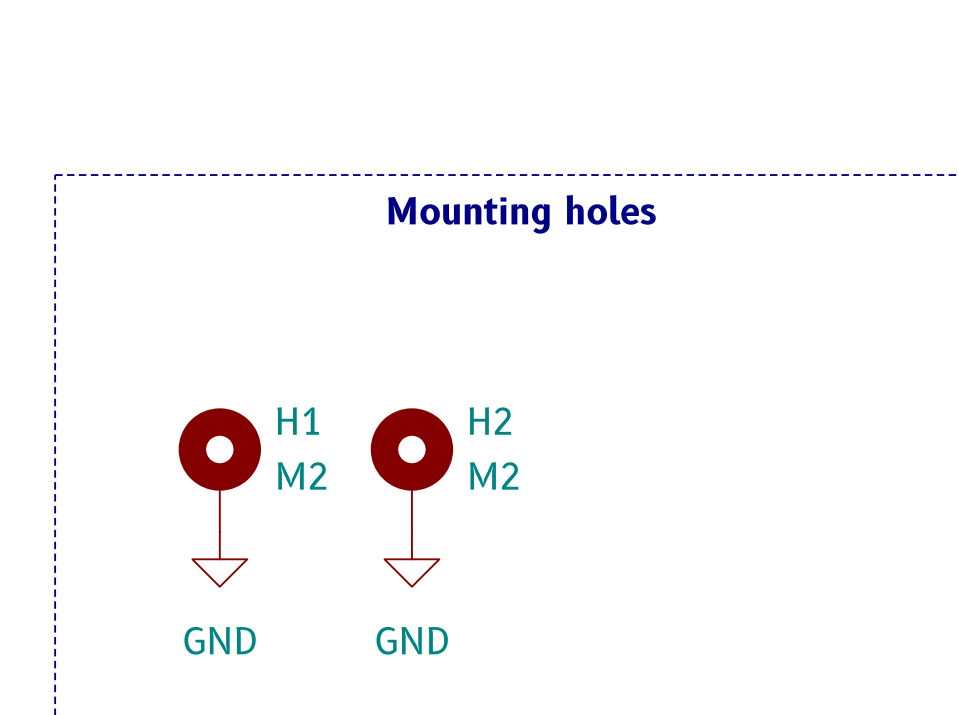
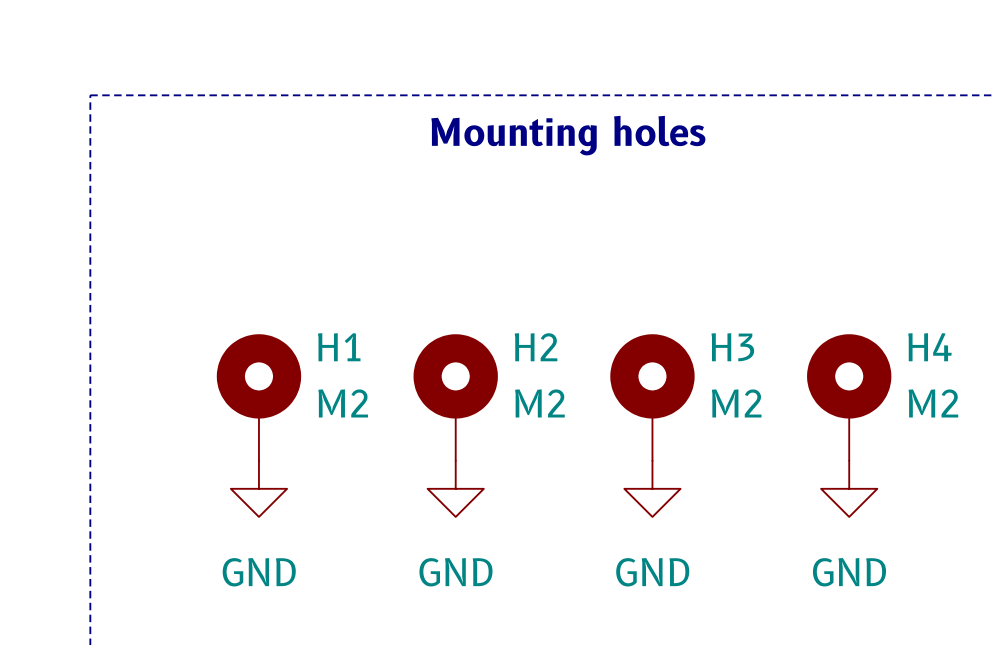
H3: none -> M2 (652, 397)
H4: none -> M2 (849, 397)
power symbol: none -> GND (652, 488)
power symbol: none -> GND (849, 488)

